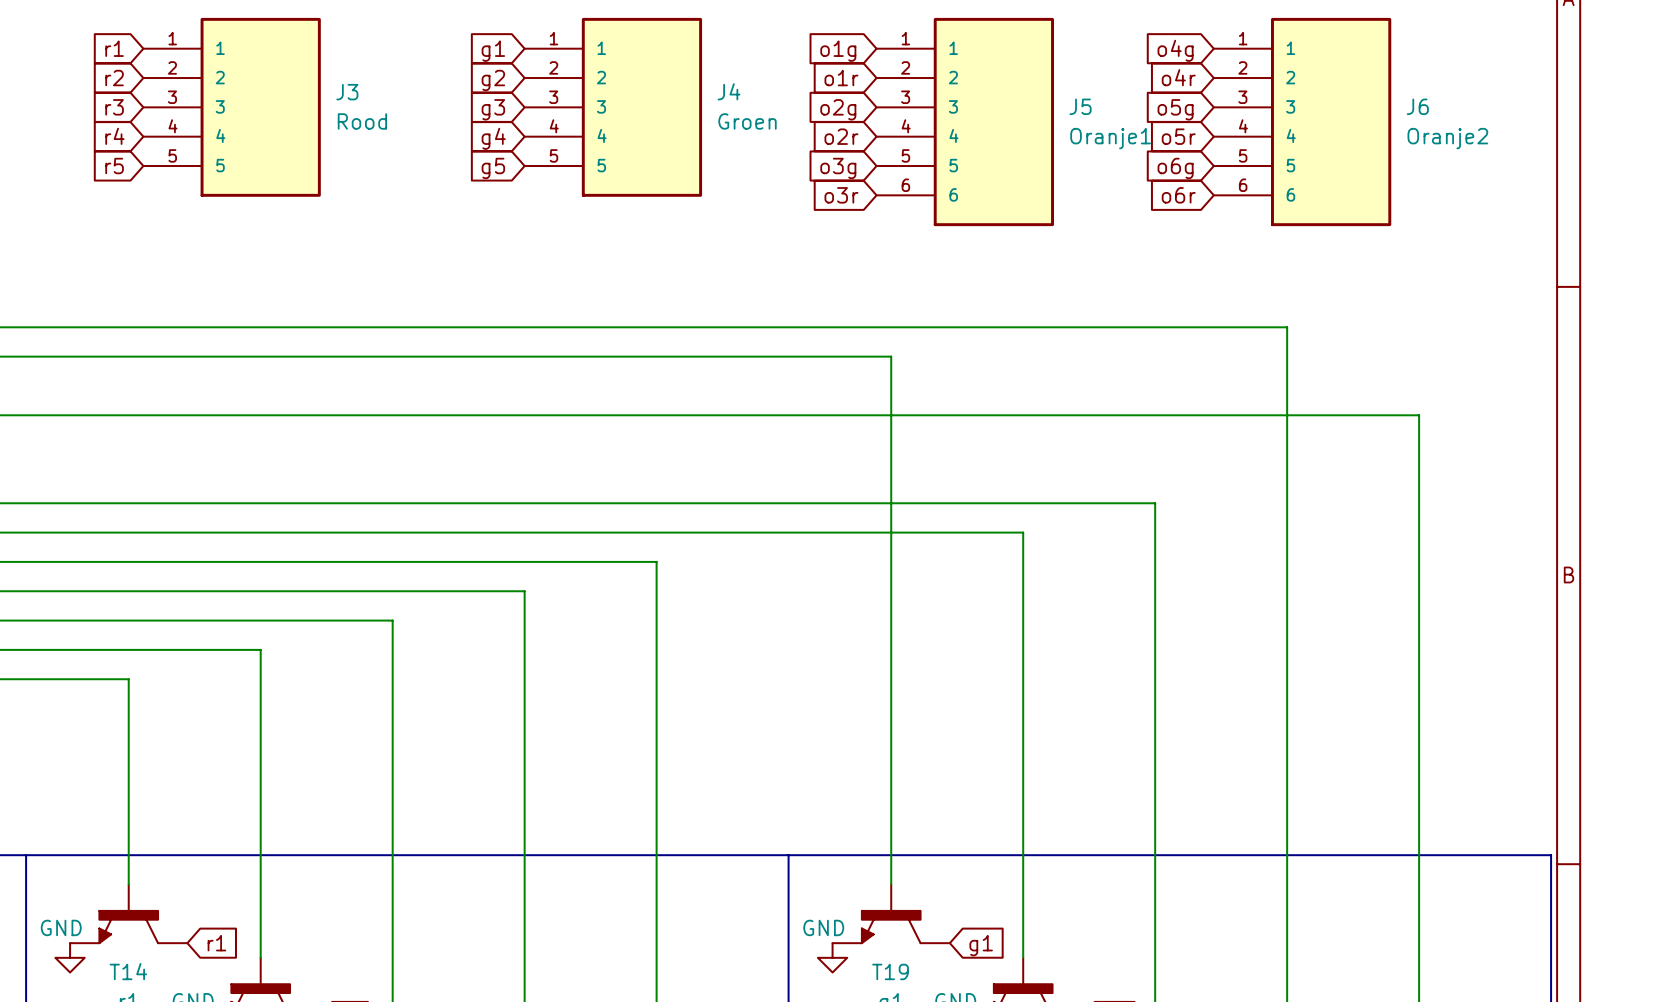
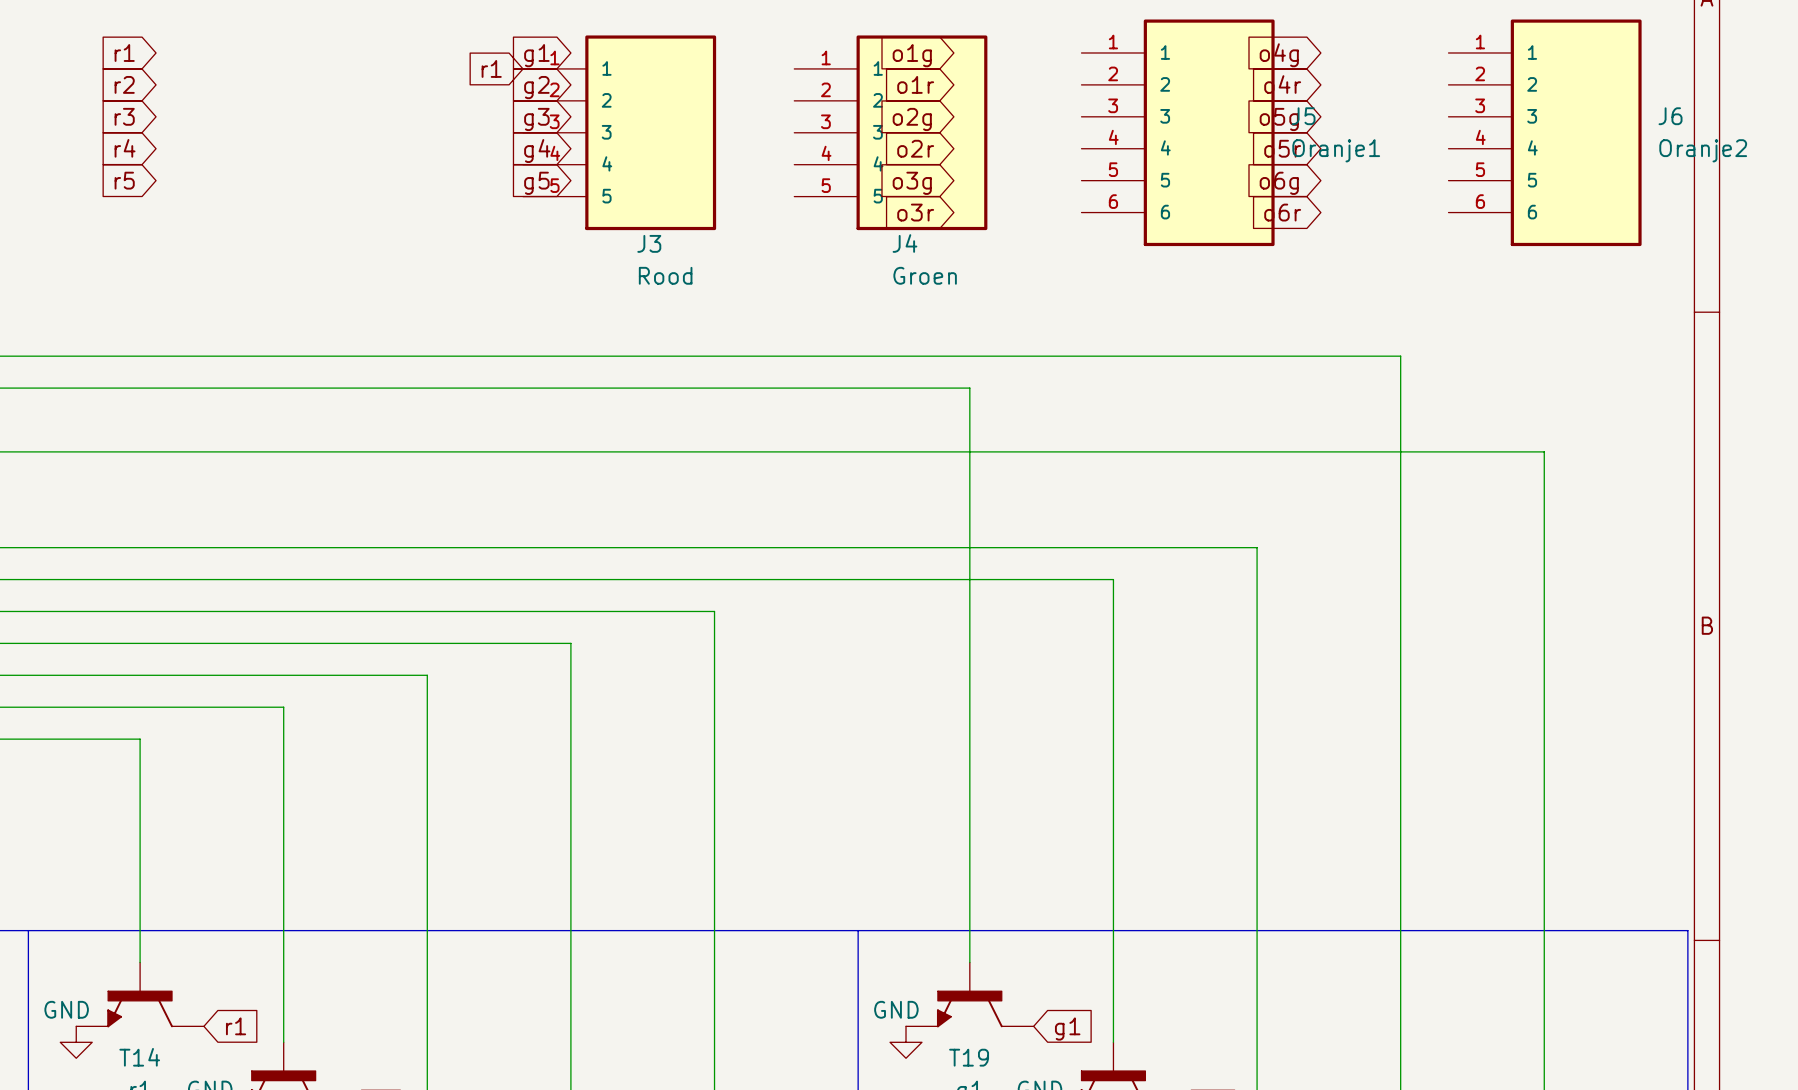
global label: none -> r1 (491, 68)
J4 name position: J4 (728, 91) -> J4 (904, 243)
J3 name position: J3 (347, 92) -> J3 (649, 243)
J3 position: (232, 107) -> (619, 132)
J4 position: (613, 107) -> (890, 132)
J3 value position: Rood (362, 121) -> Rood (665, 275)
J4 value position: Groen (747, 121) -> Groen (925, 275)
J5 position: (965, 122) -> (1178, 132)
J6 position: (1302, 122) -> (1545, 132)

